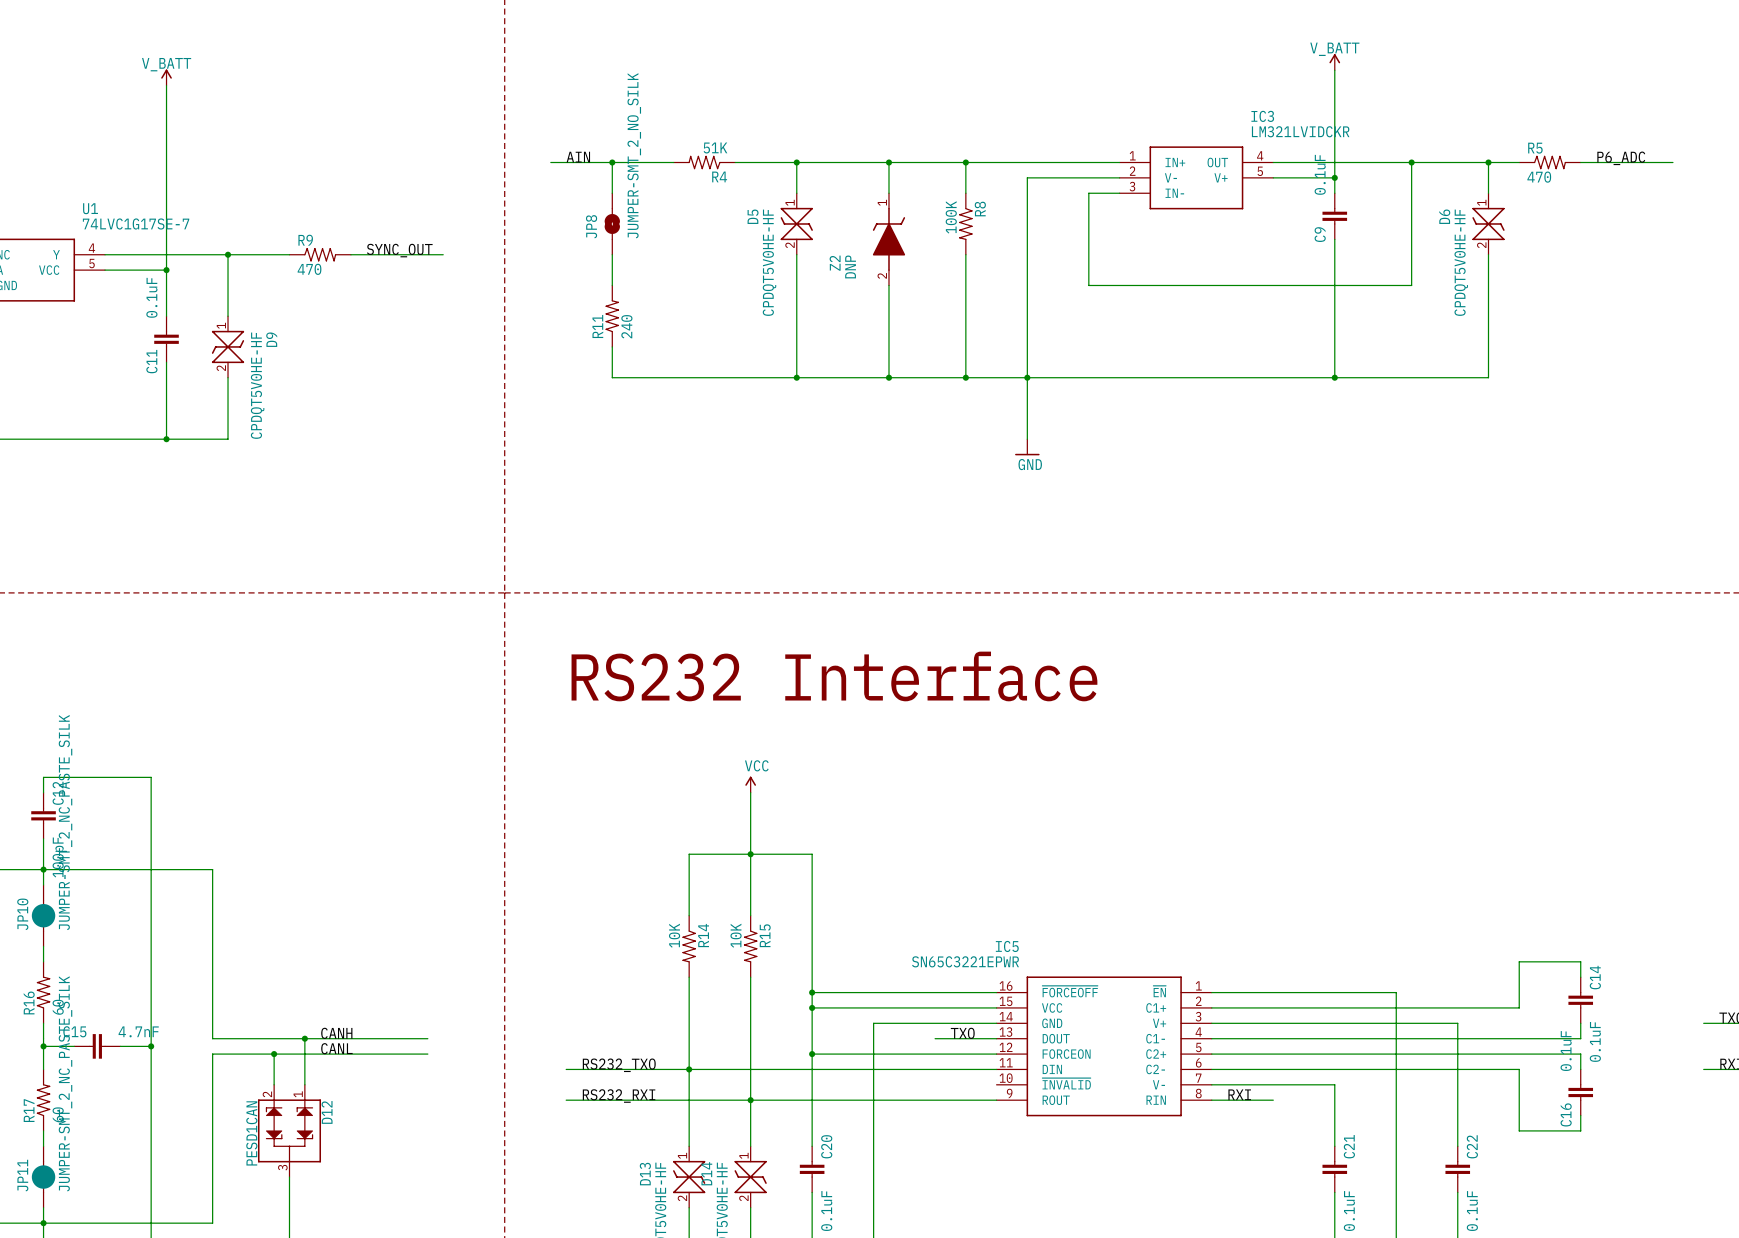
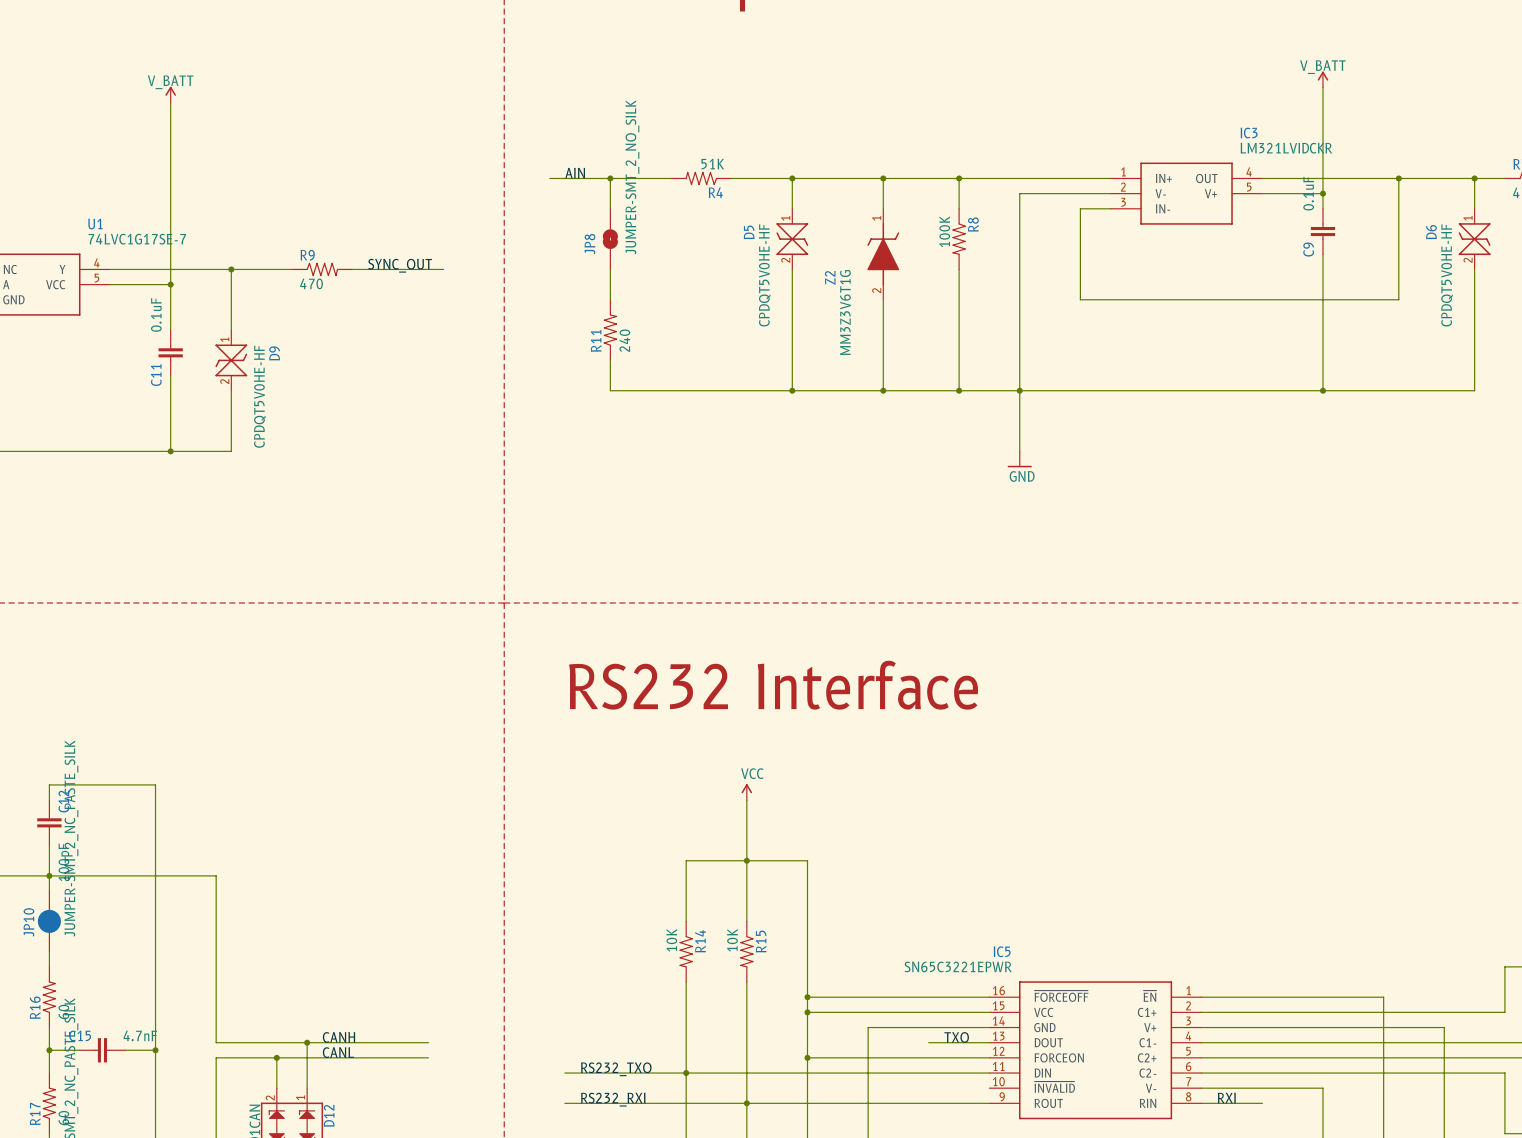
Z2 value: DNP (850, 266) -> MM3Z3V6T1G (845, 312)

